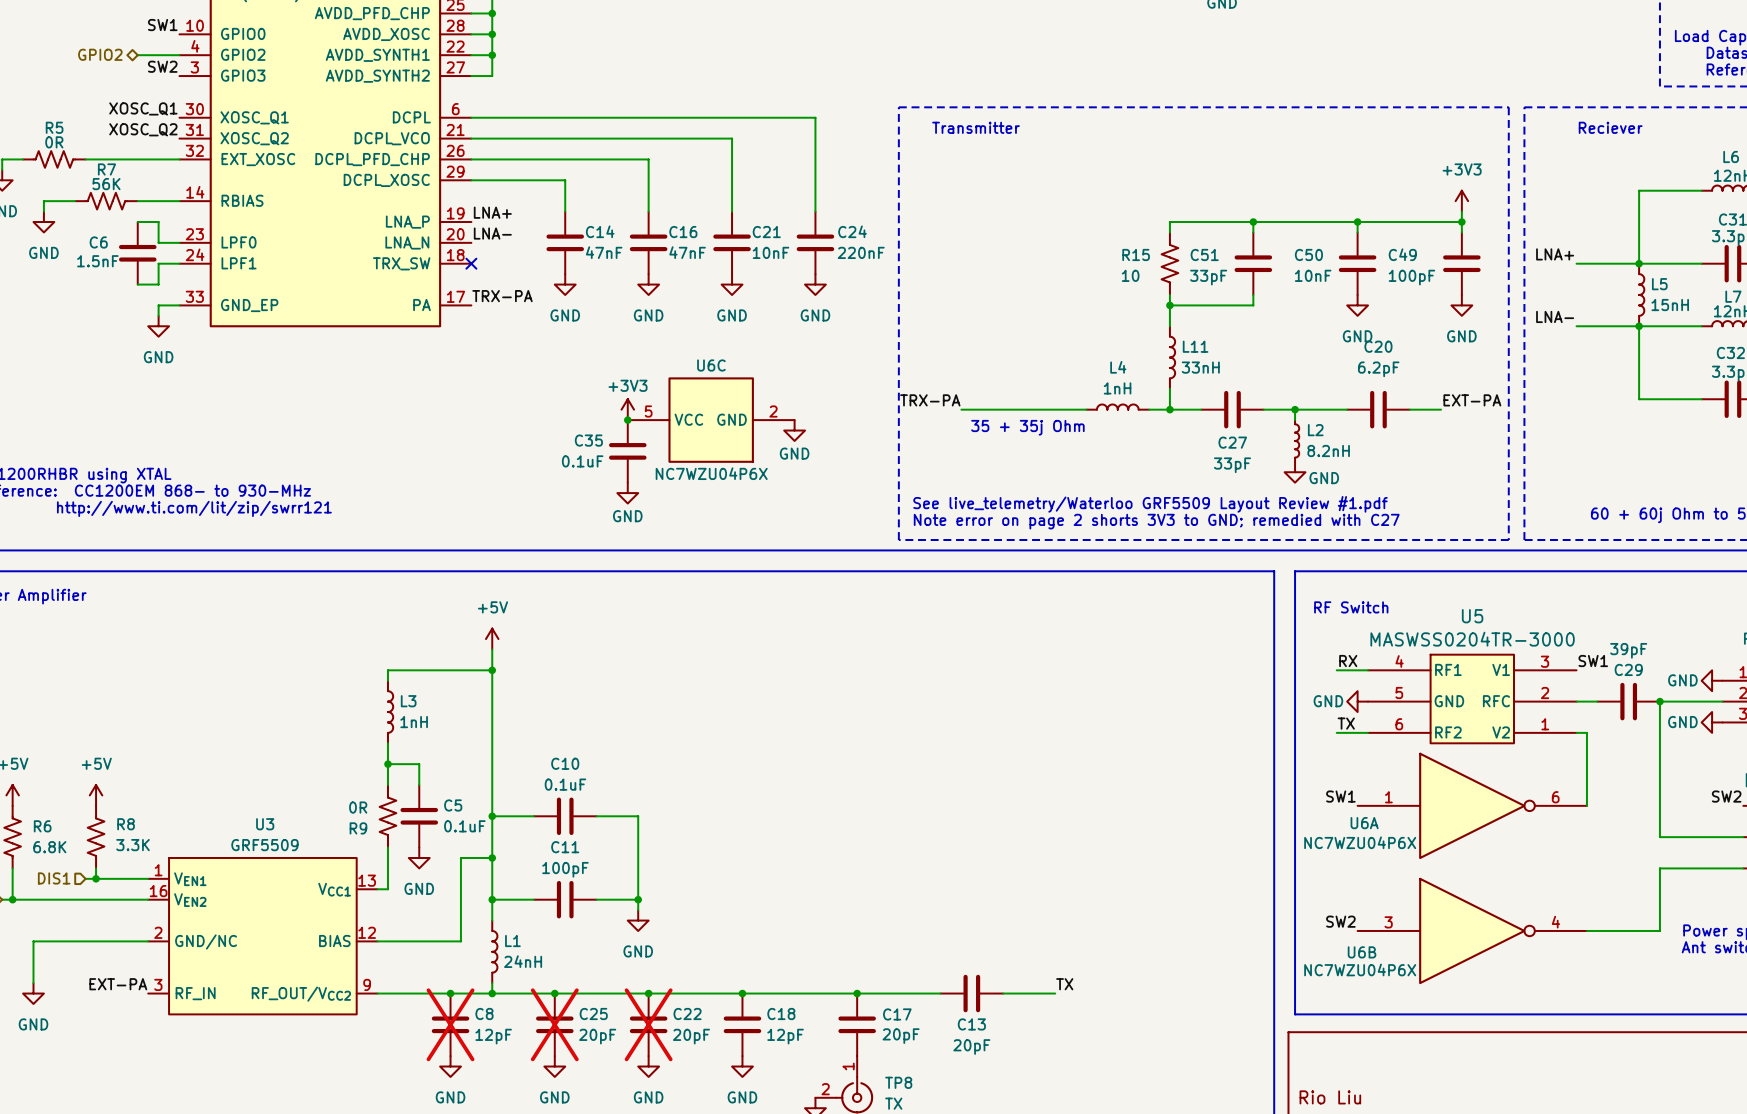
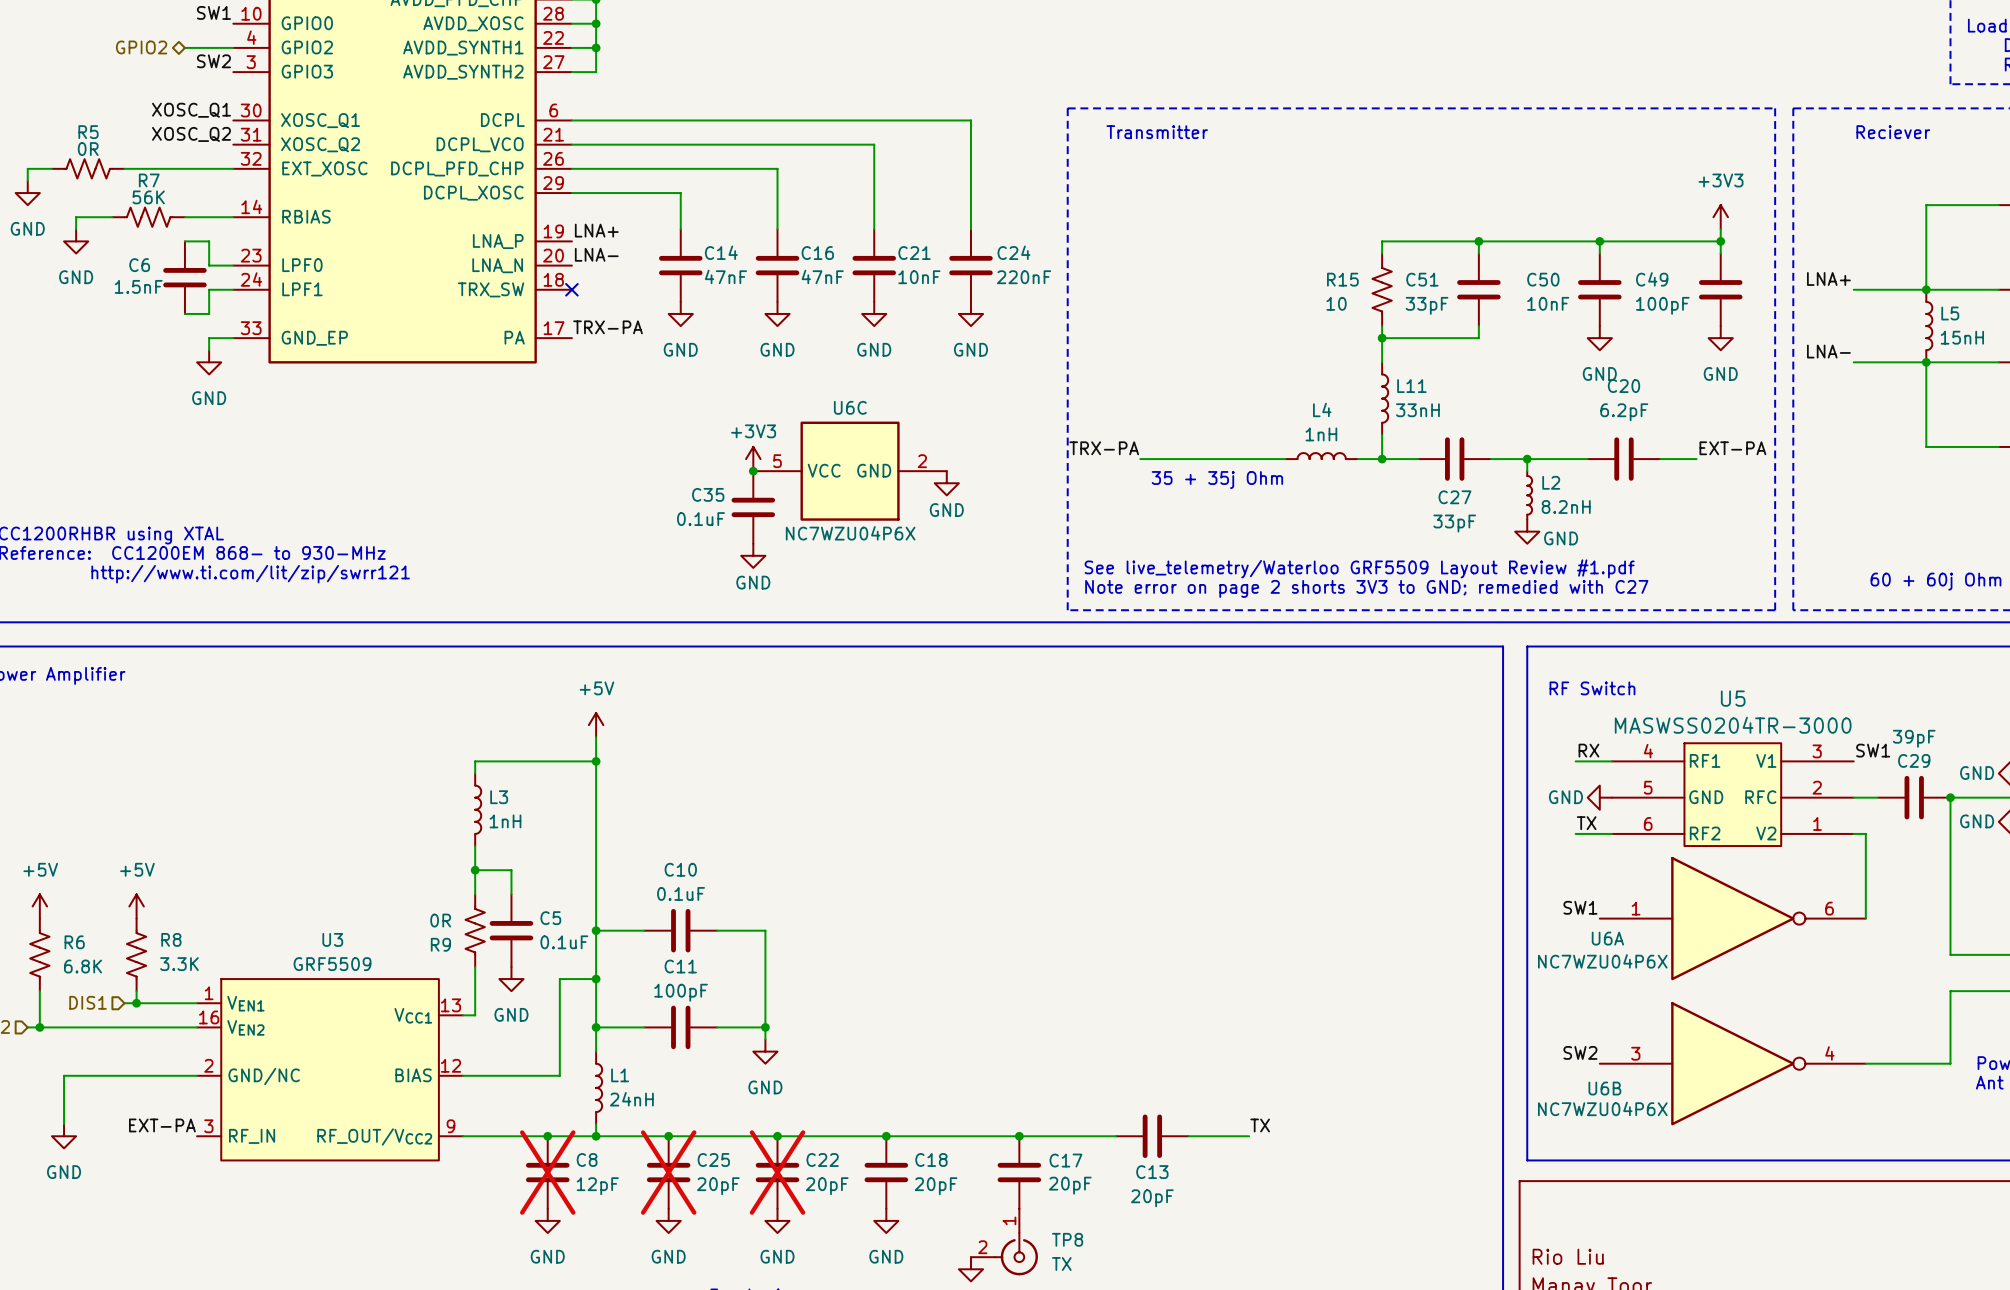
C18 value: 12pF (785, 1036) -> 20pF (936, 1186)

